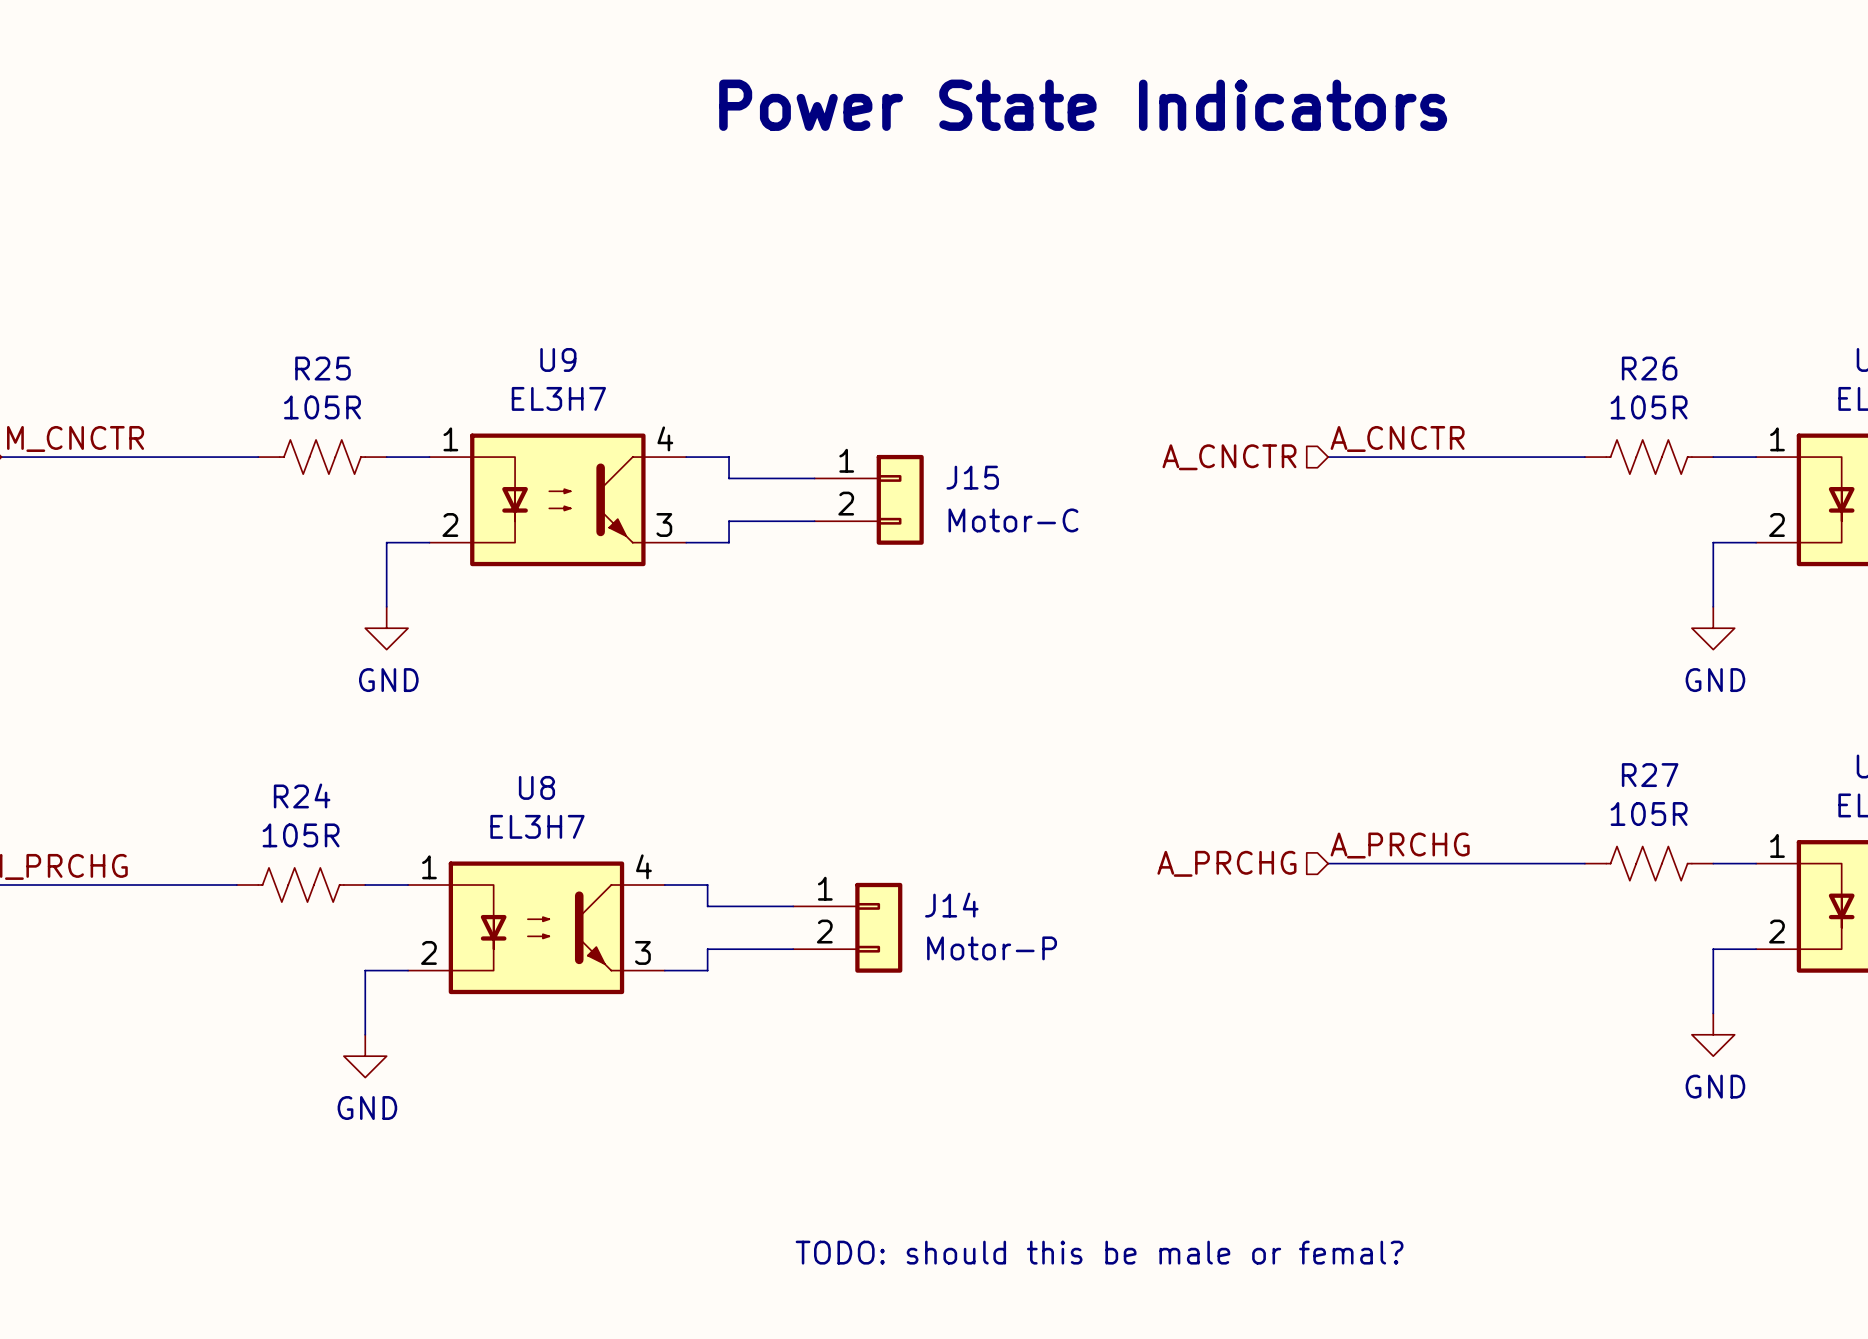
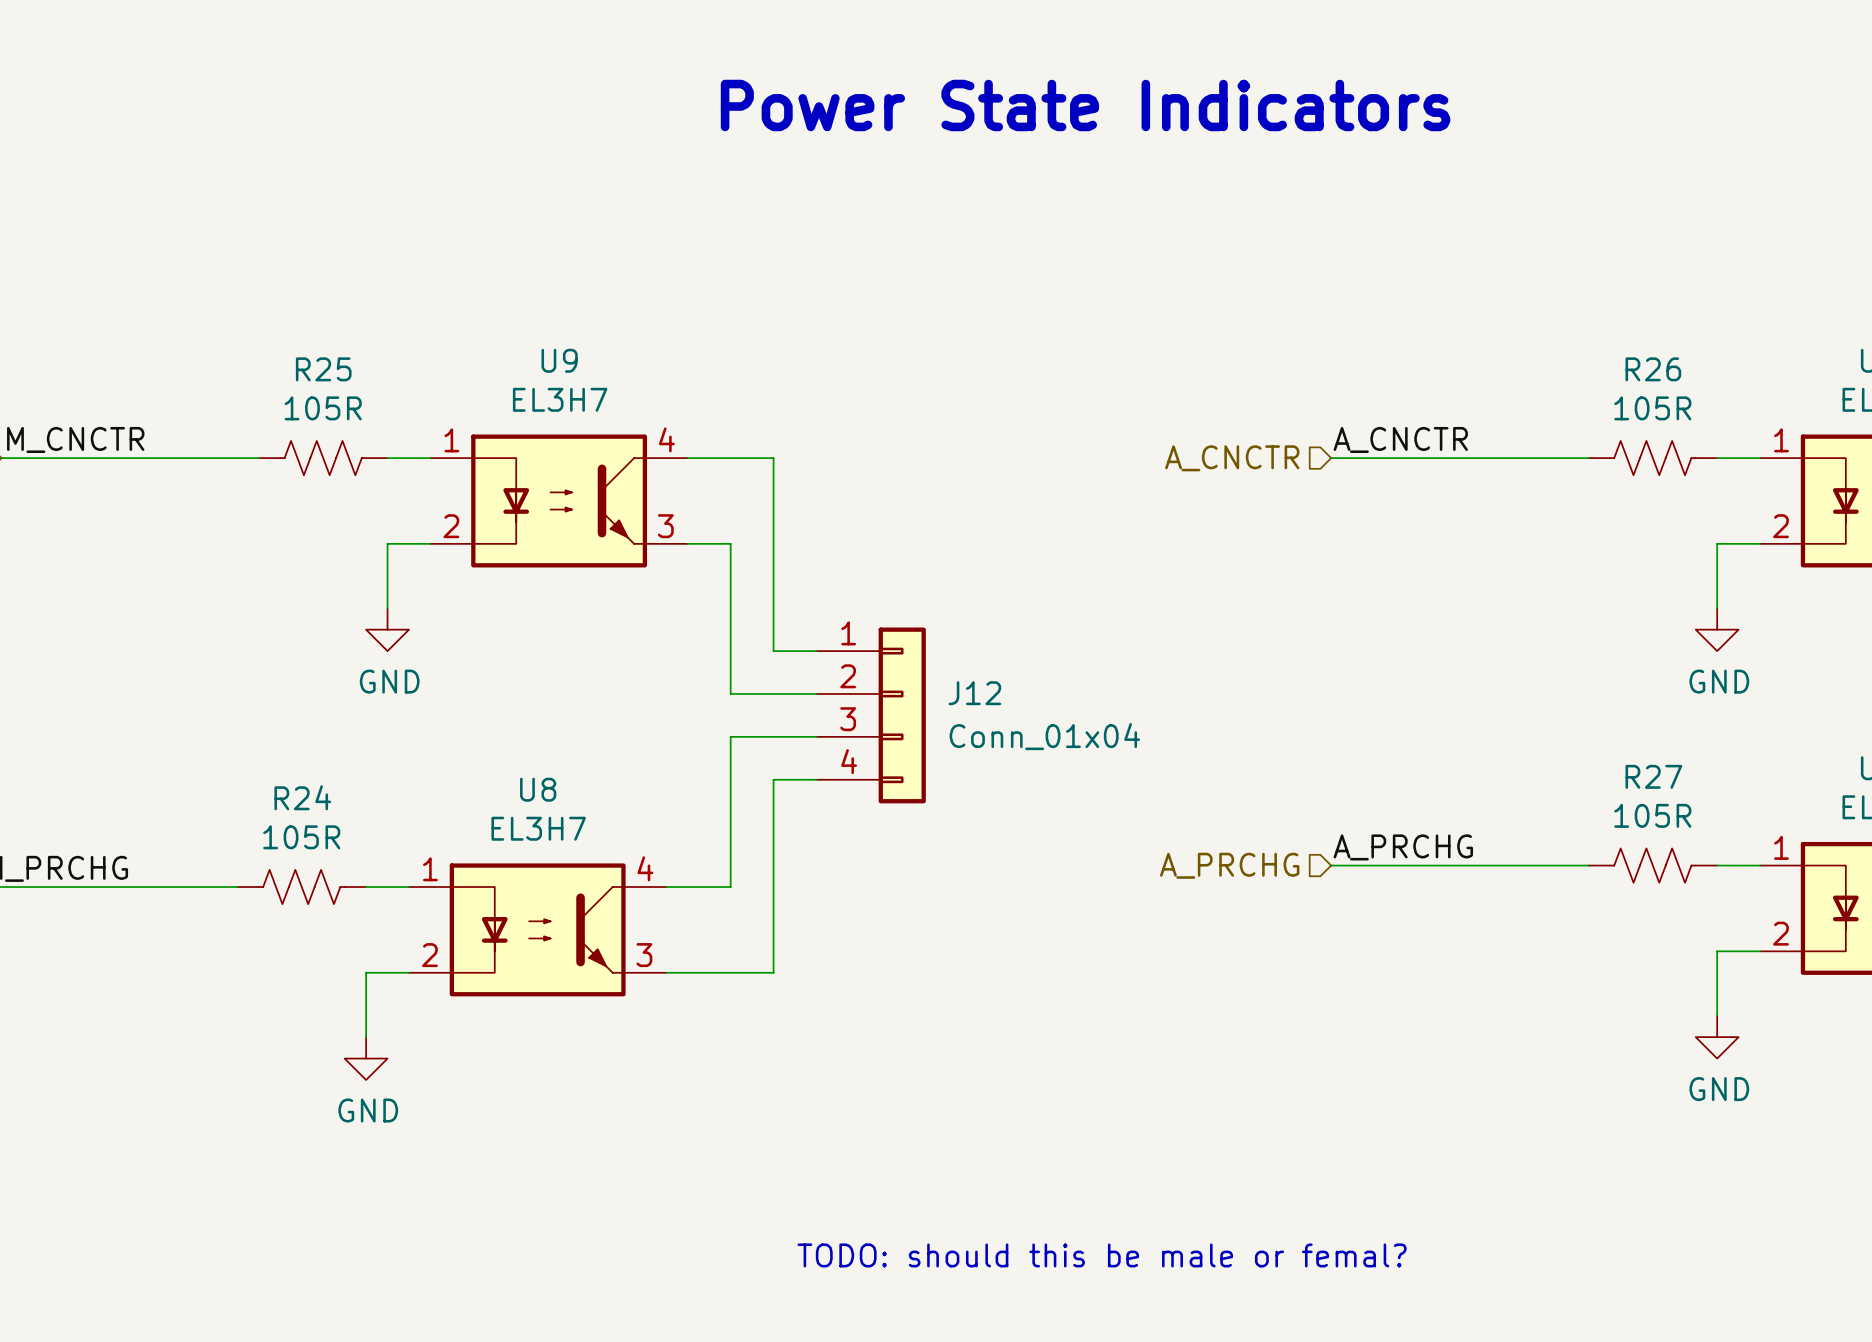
wire: (729, 457) (729, 478) (814, 478) -> (730, 458) (773, 458) (773, 651) (816, 651)
J15: Motor-C (869, 499) -> none
wire: (814, 521) (729, 521) (729, 542) -> (816, 693) (730, 693) (730, 543)
J12: none -> Conn_01x04 (871, 715)
wire: (707, 885) (707, 906) (793, 906) -> (709, 887) (730, 887) (730, 736) (816, 736)
J14: Motor-P (847, 927) -> none
wire: (793, 949) (707, 949) (707, 970) -> (816, 779) (773, 779) (773, 972) (709, 972)

